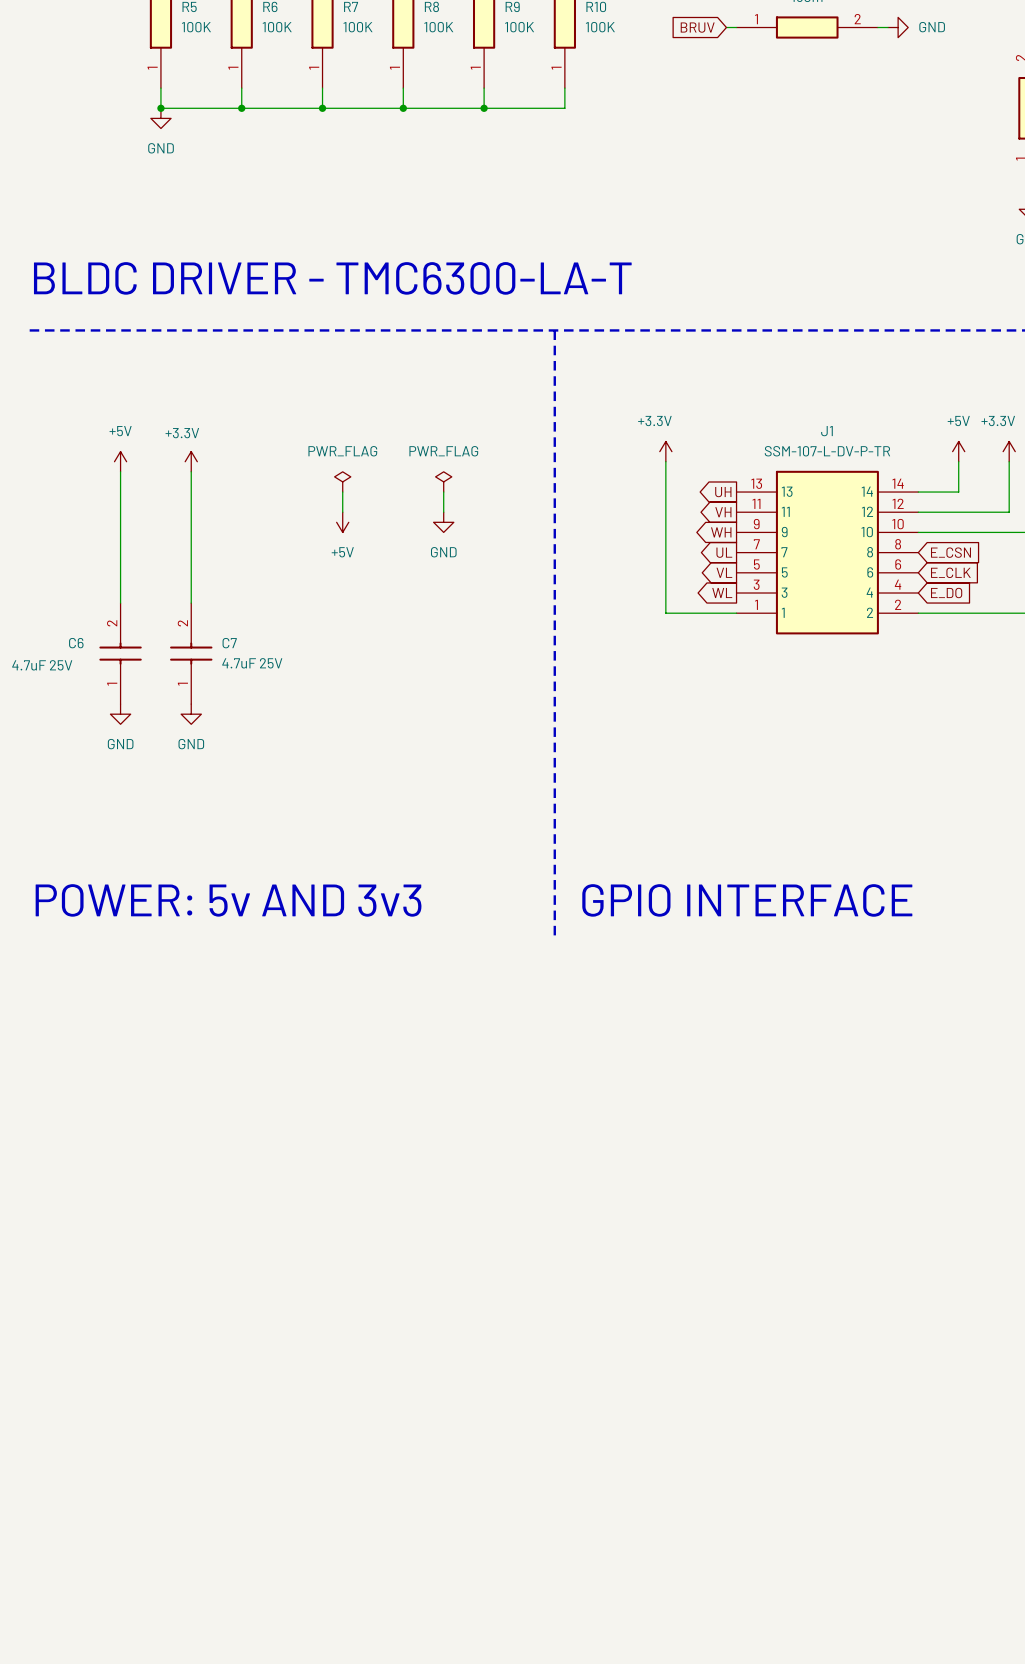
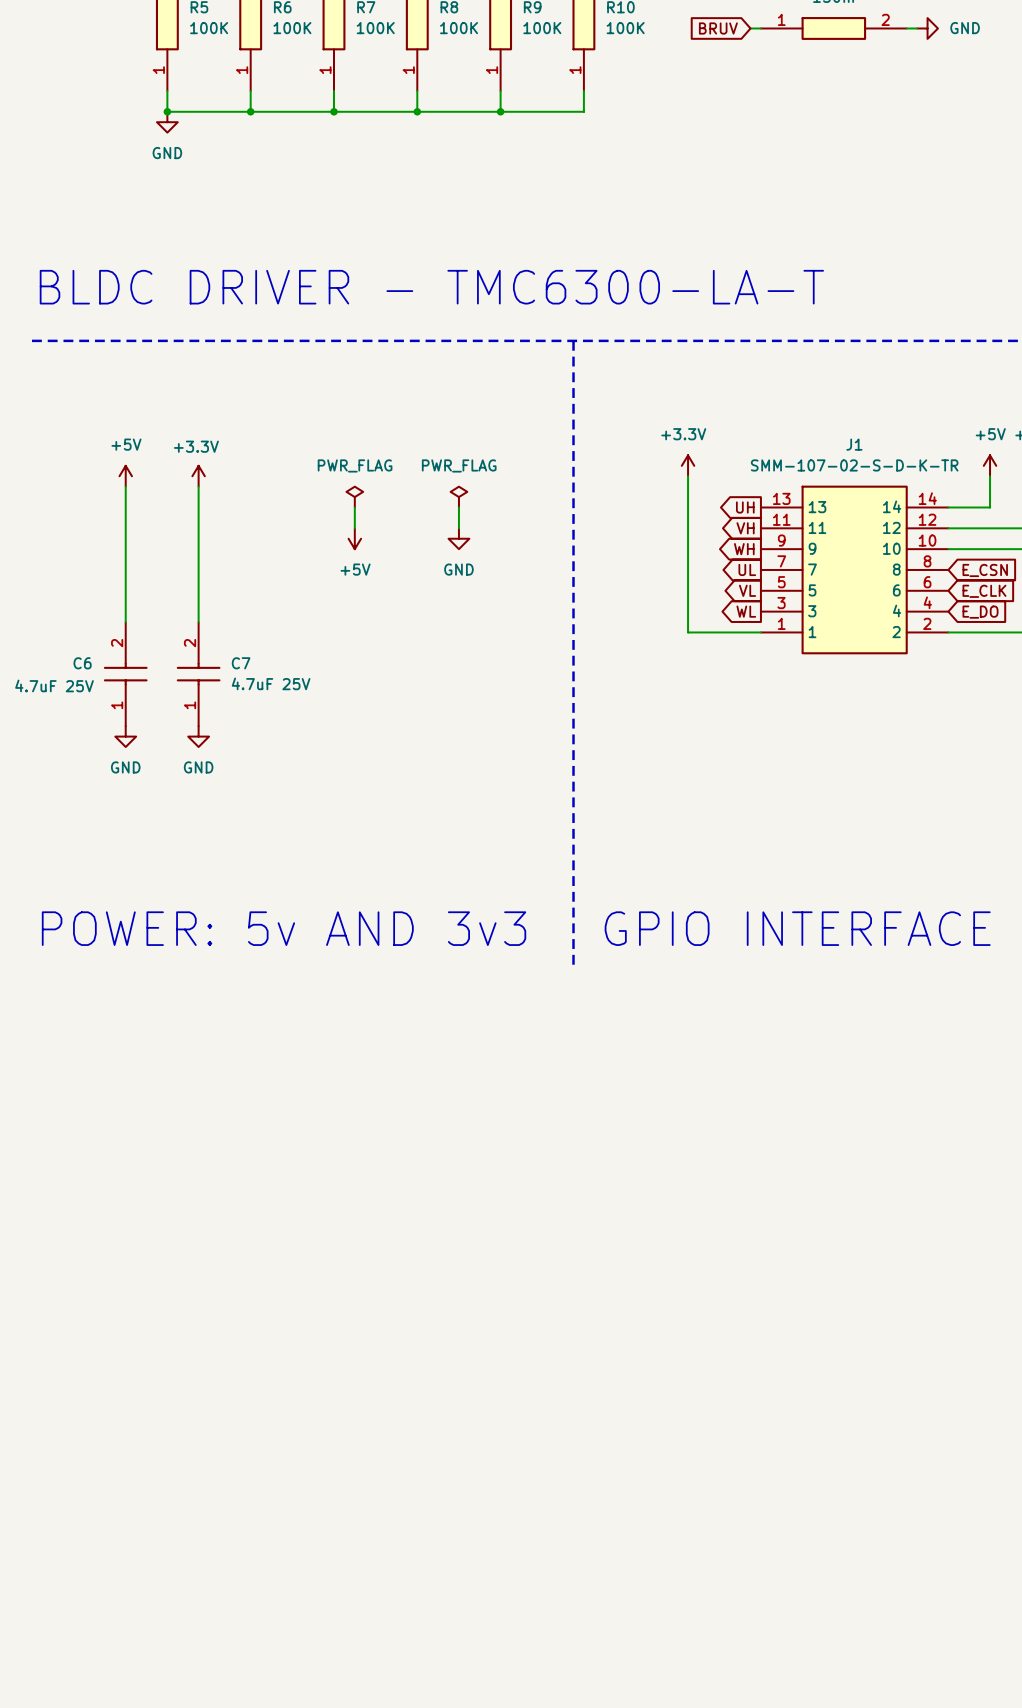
J1 value: SSM-107-L-DV-P-TR (827, 451) -> SMM-107-02-S-D-K-TR (854, 465)

